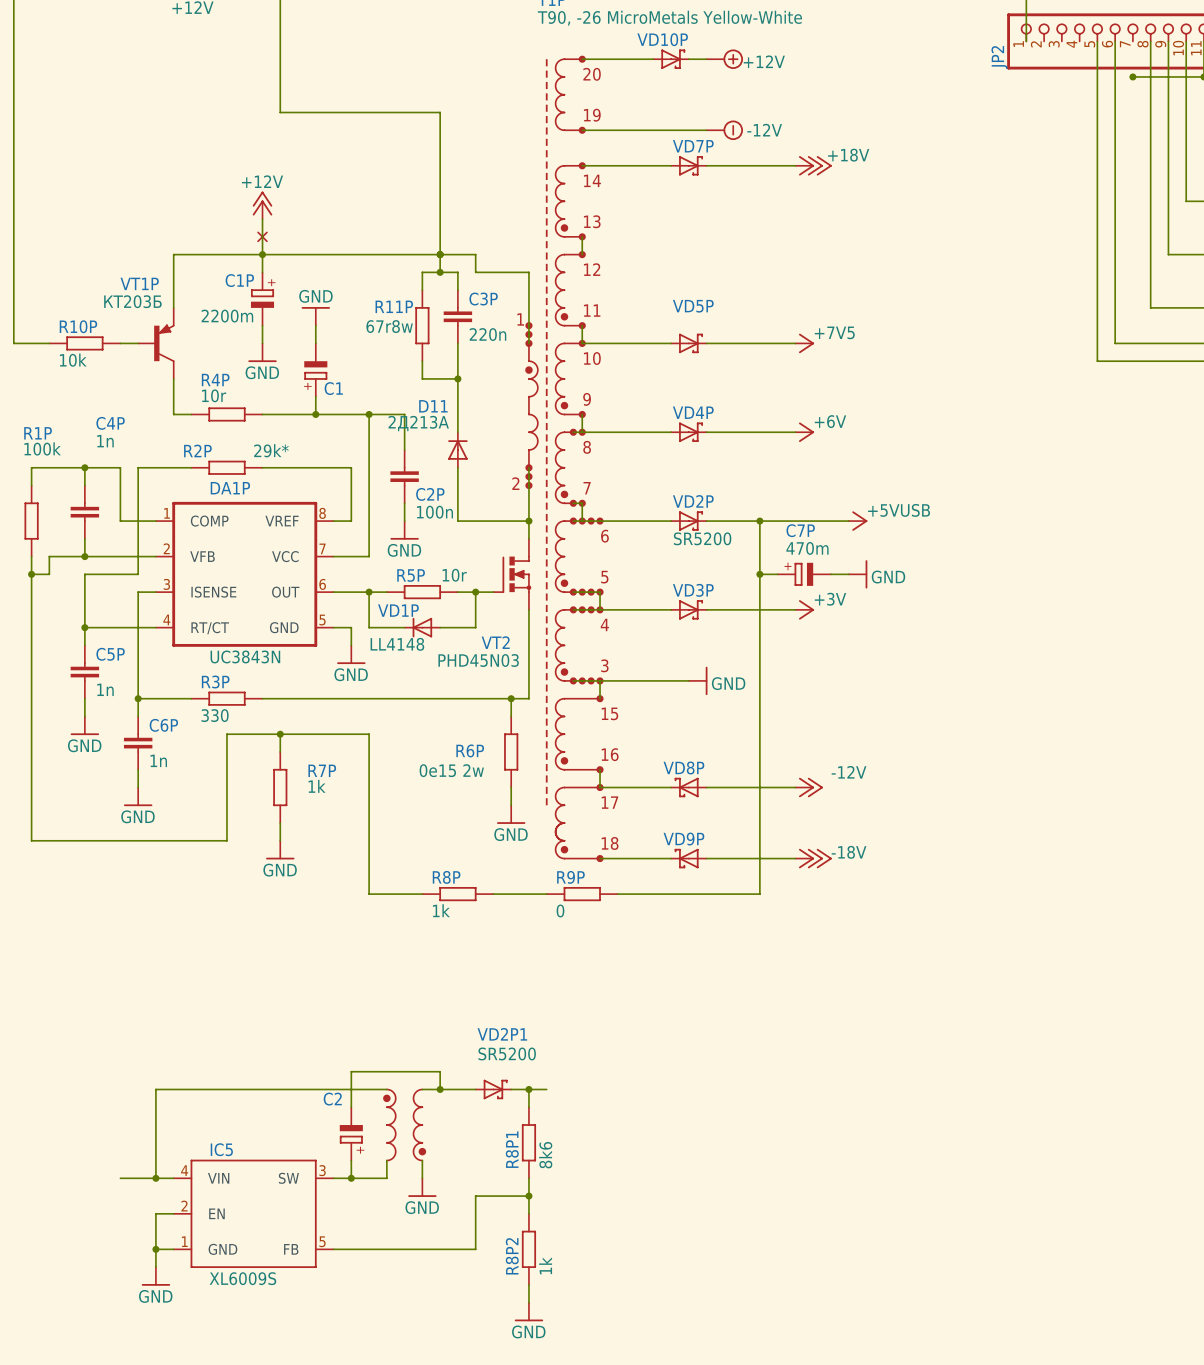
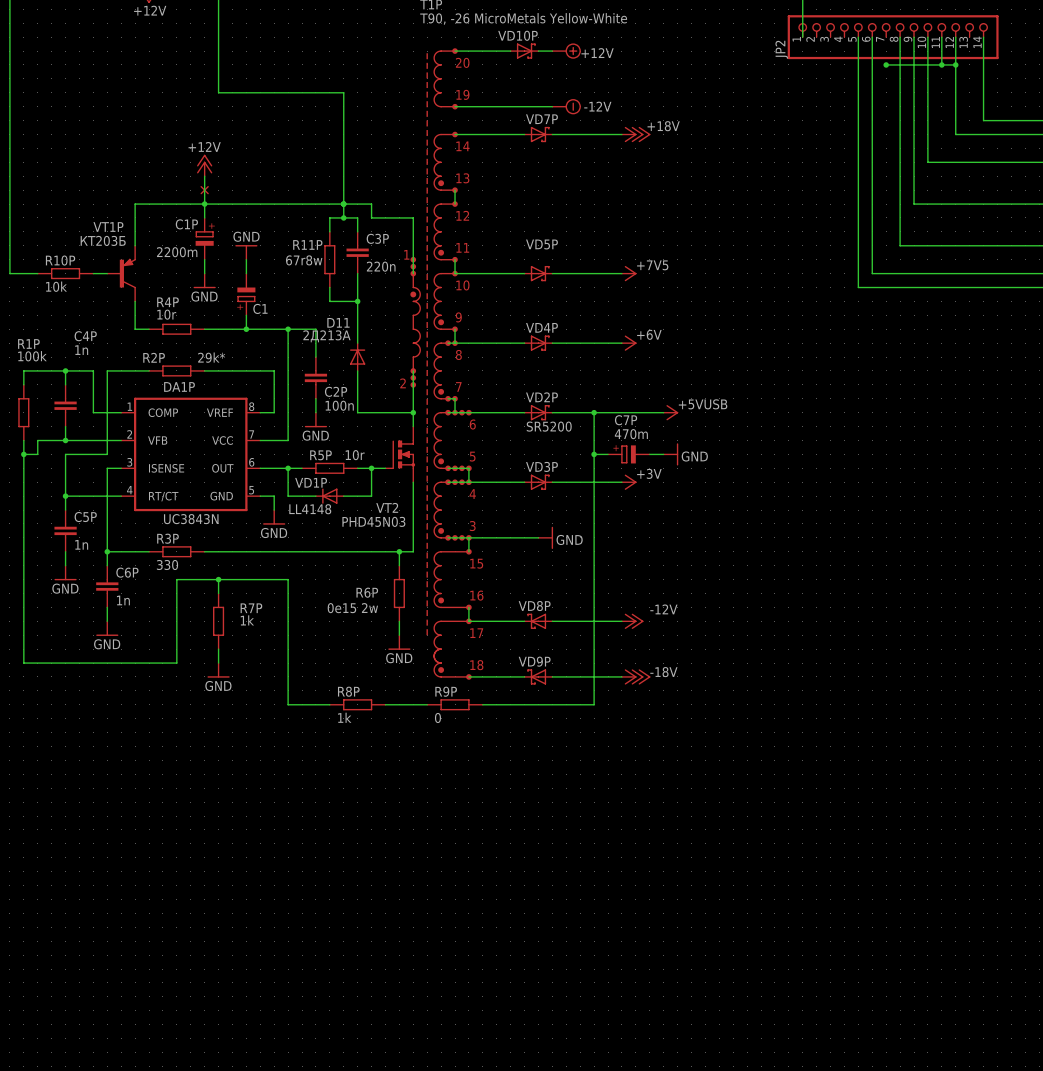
line: (386, 1089) (393, 1092) (395, 1098) (393, 1104) (386, 1107) (392, 1109) (395, 1114) (393, 1121) (386, 1125) (392, 1126) (395, 1131) (393, 1139) (386, 1142) (393, 1146) (395, 1152) (392, 1158) (386, 1160) -> none
wire: (386, 1089) (155, 1089) (155, 1178) -> none
line: (422, 1089) (416, 1092) (413, 1098) (416, 1104) (422, 1107) (416, 1109) (413, 1114) (415, 1121) (422, 1125) (416, 1126) (413, 1131) (415, 1139) (422, 1142) (415, 1146) (413, 1152) (416, 1158) (422, 1160) -> none
wire: (422, 1089) (475, 1089) -> none
wire: (440, 1089) (440, 1071) (351, 1071) (351, 1107) -> none
junction: (440, 1089) -> none
VD2P1: SR5200 (493, 1089) -> none
wire: (511, 1089) (546, 1089) -> none
wire: (528, 1089) (528, 1107) -> none
junction: (528, 1089) -> none
drawing: [383, 1094, 391, 1103] -> none
C2: (351, 1133) -> none
R8P1: 8k6 (528, 1142) -> none
drawing: [418, 1147, 427, 1156] -> none
wire: (351, 1160) (351, 1178) -> none
wire: (386, 1160) (386, 1178) (333, 1178) -> none
wire: (422, 1160) (422, 1178) -> none
wire: (120, 1178) (173, 1178) -> none
junction: (155, 1178) -> none
junction: (351, 1178) -> none
wire: (528, 1178) (528, 1213) -> none
power symbol: GND (422, 1187) -> none
wire: (528, 1196) (475, 1196) (475, 1249) (333, 1249) -> none
junction: (528, 1196) -> none
wire: (173, 1213) (155, 1213) (155, 1267) -> none
IC5: XL6009S (253, 1213) -> none
wire: (155, 1249) (173, 1249) -> none
junction: (155, 1249) -> none
R8P2: 1k (528, 1249) -> none
power symbol: GND (155, 1276) -> none
wire: (528, 1284) (528, 1302) -> none
power symbol: GND (528, 1311) -> none

